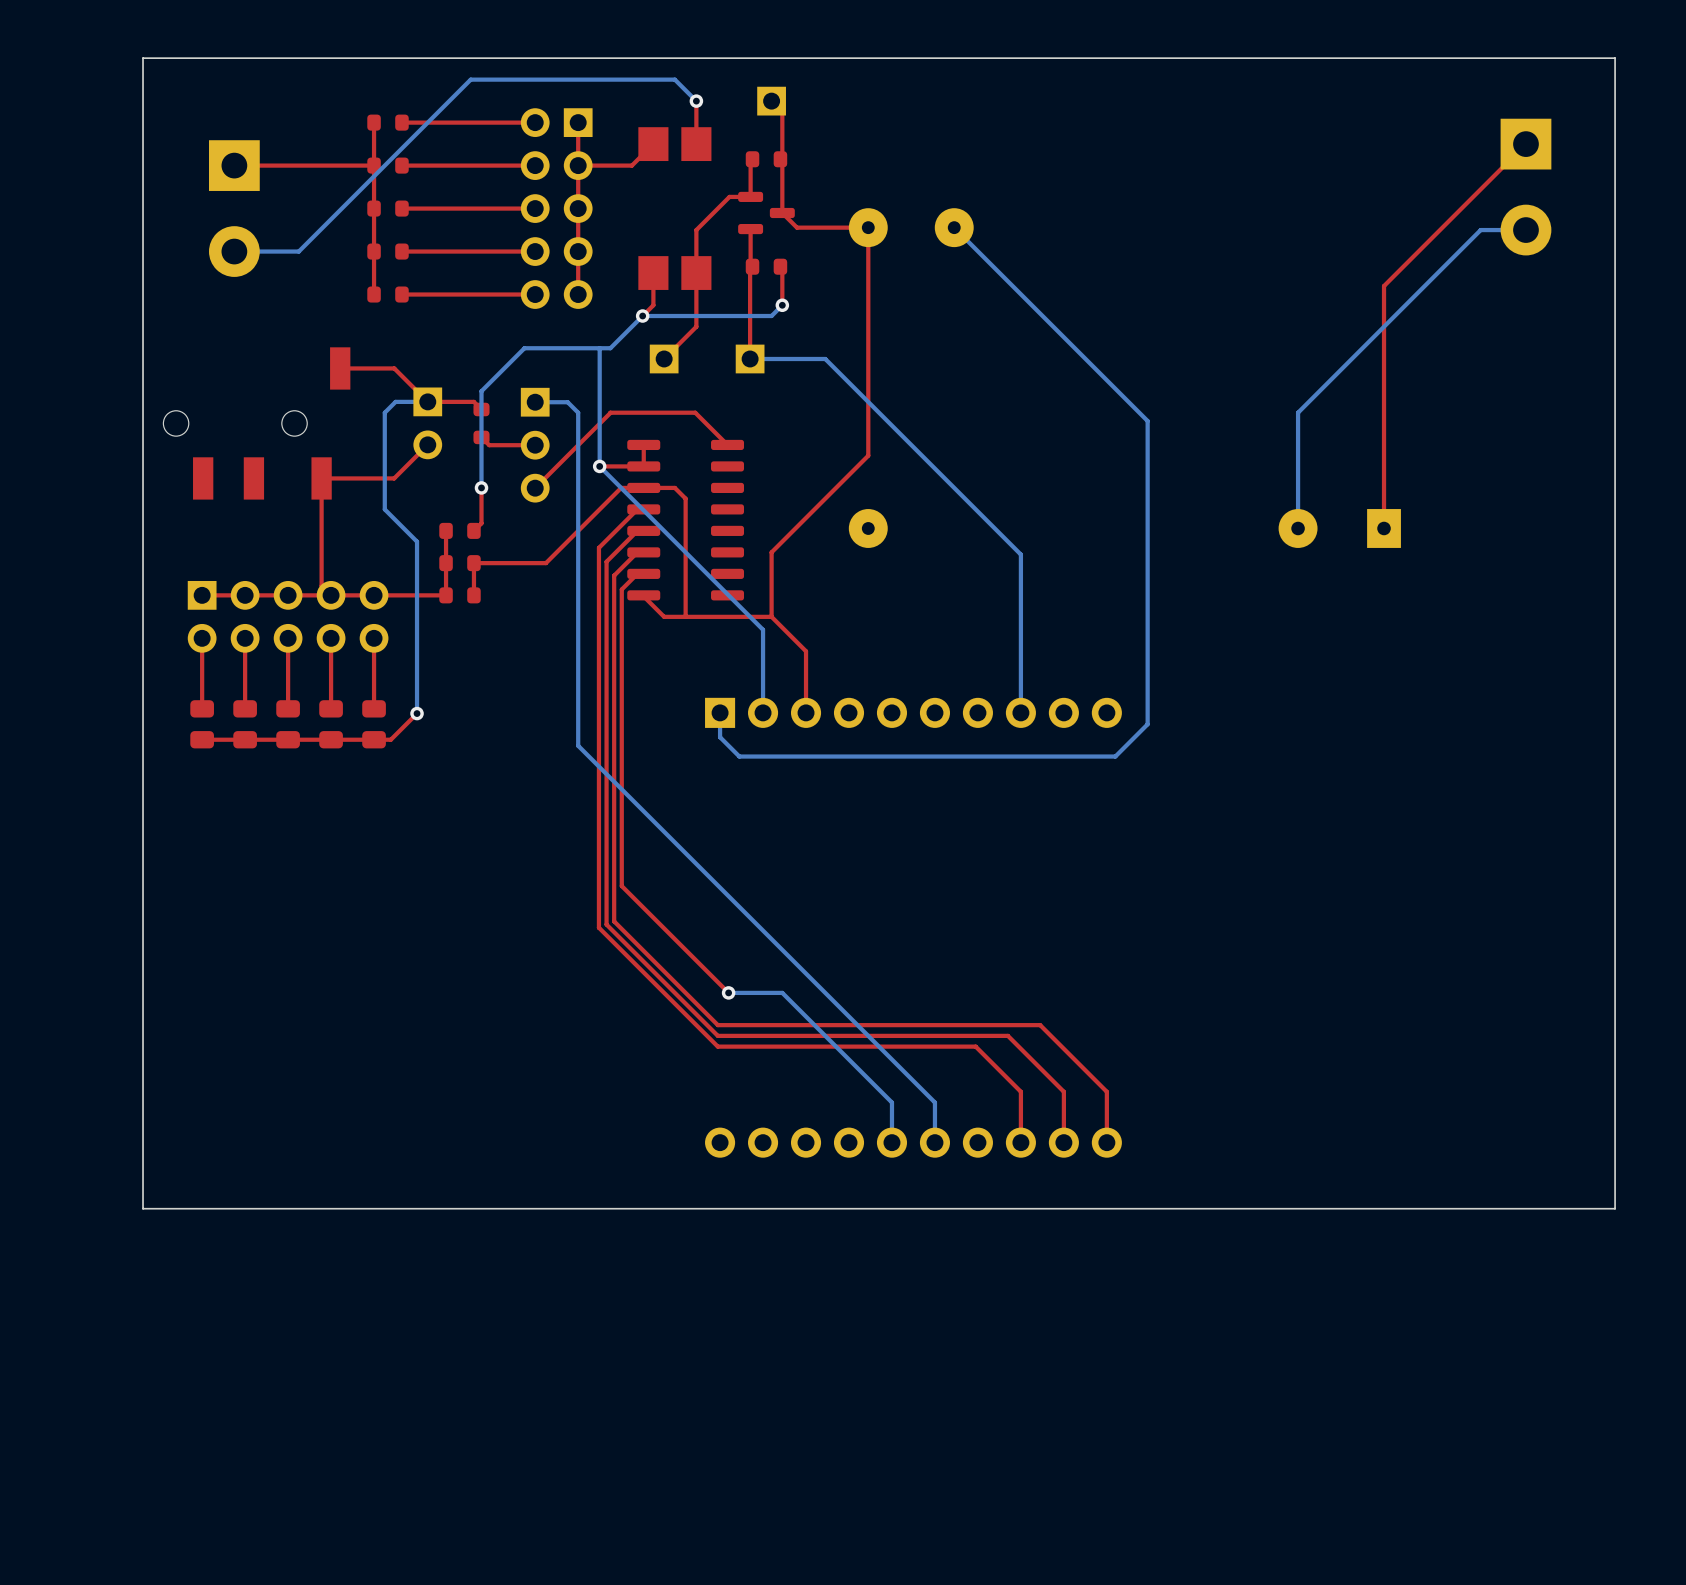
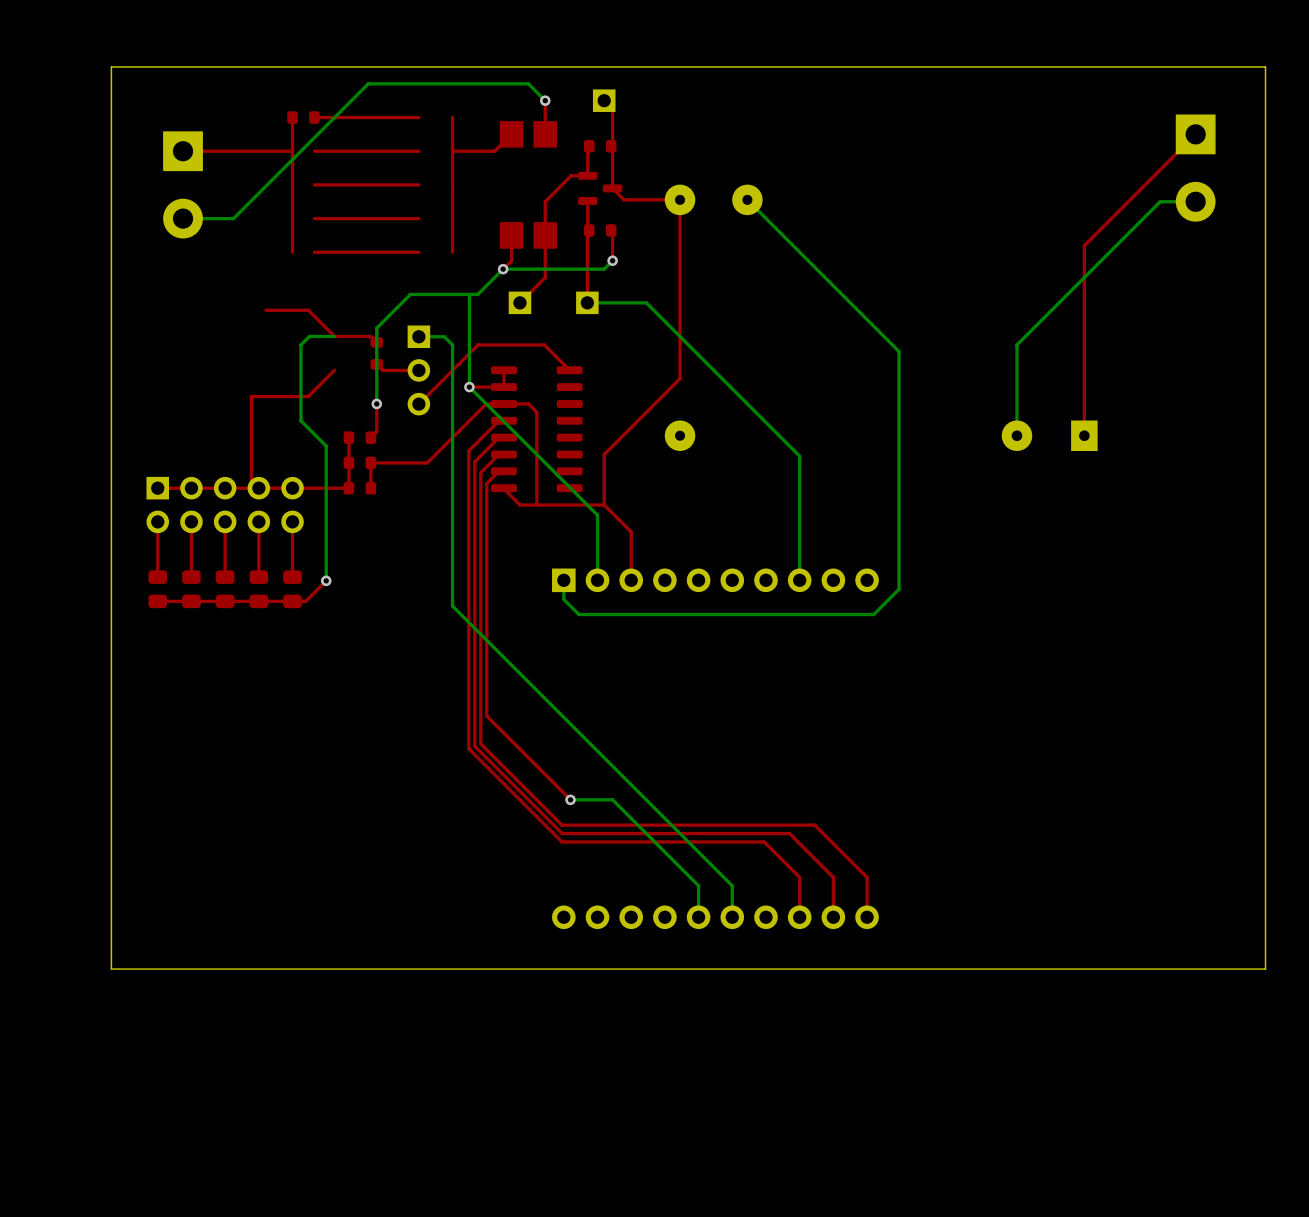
part: (388, 165) -> none
part: (388, 208) -> none
part: (556, 208) -> none
part: (388, 251) -> none
part: (388, 294) -> none
part: (256, 423) -> none
part: (427, 423) -> none

